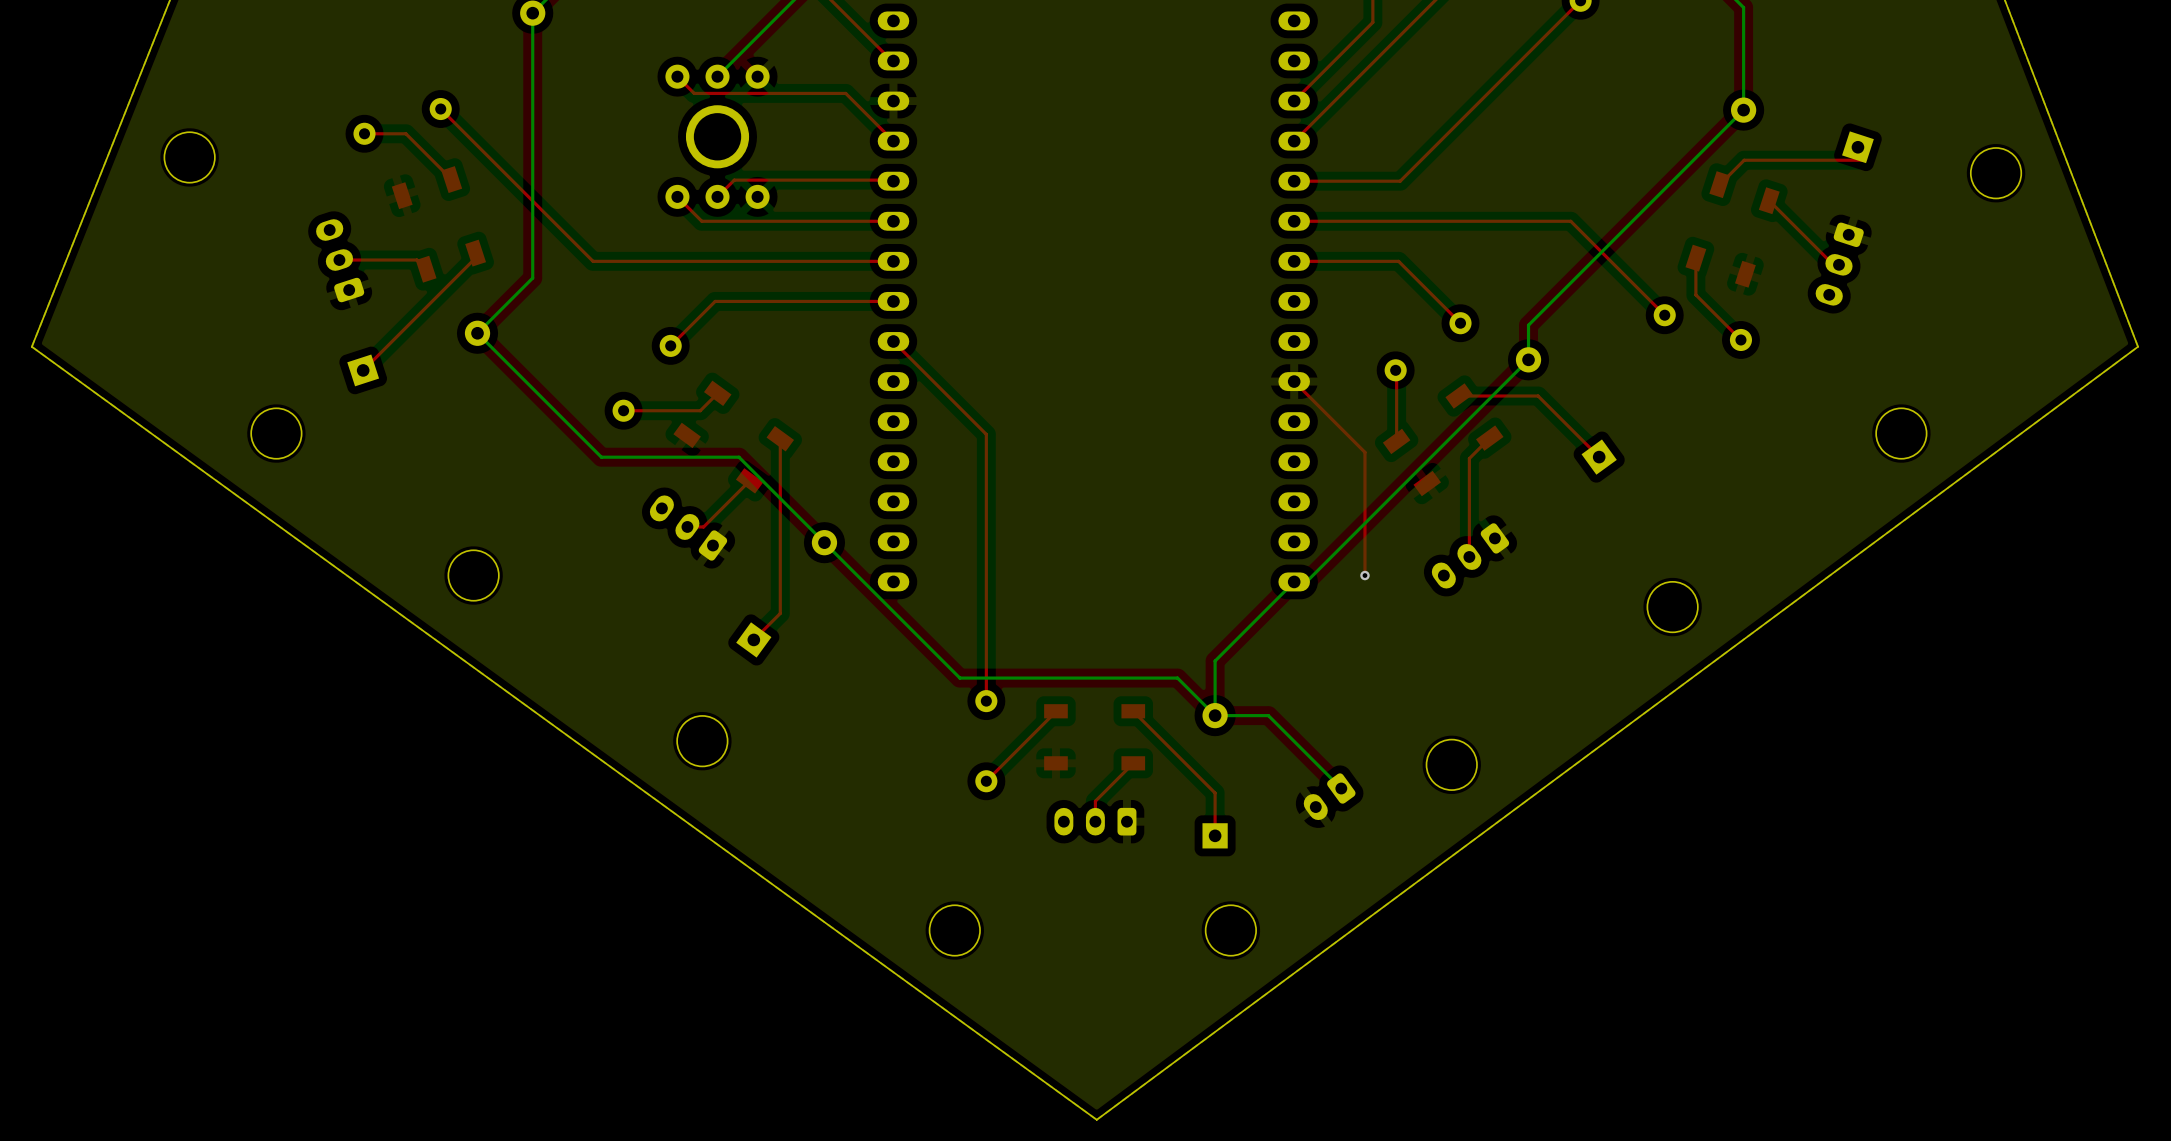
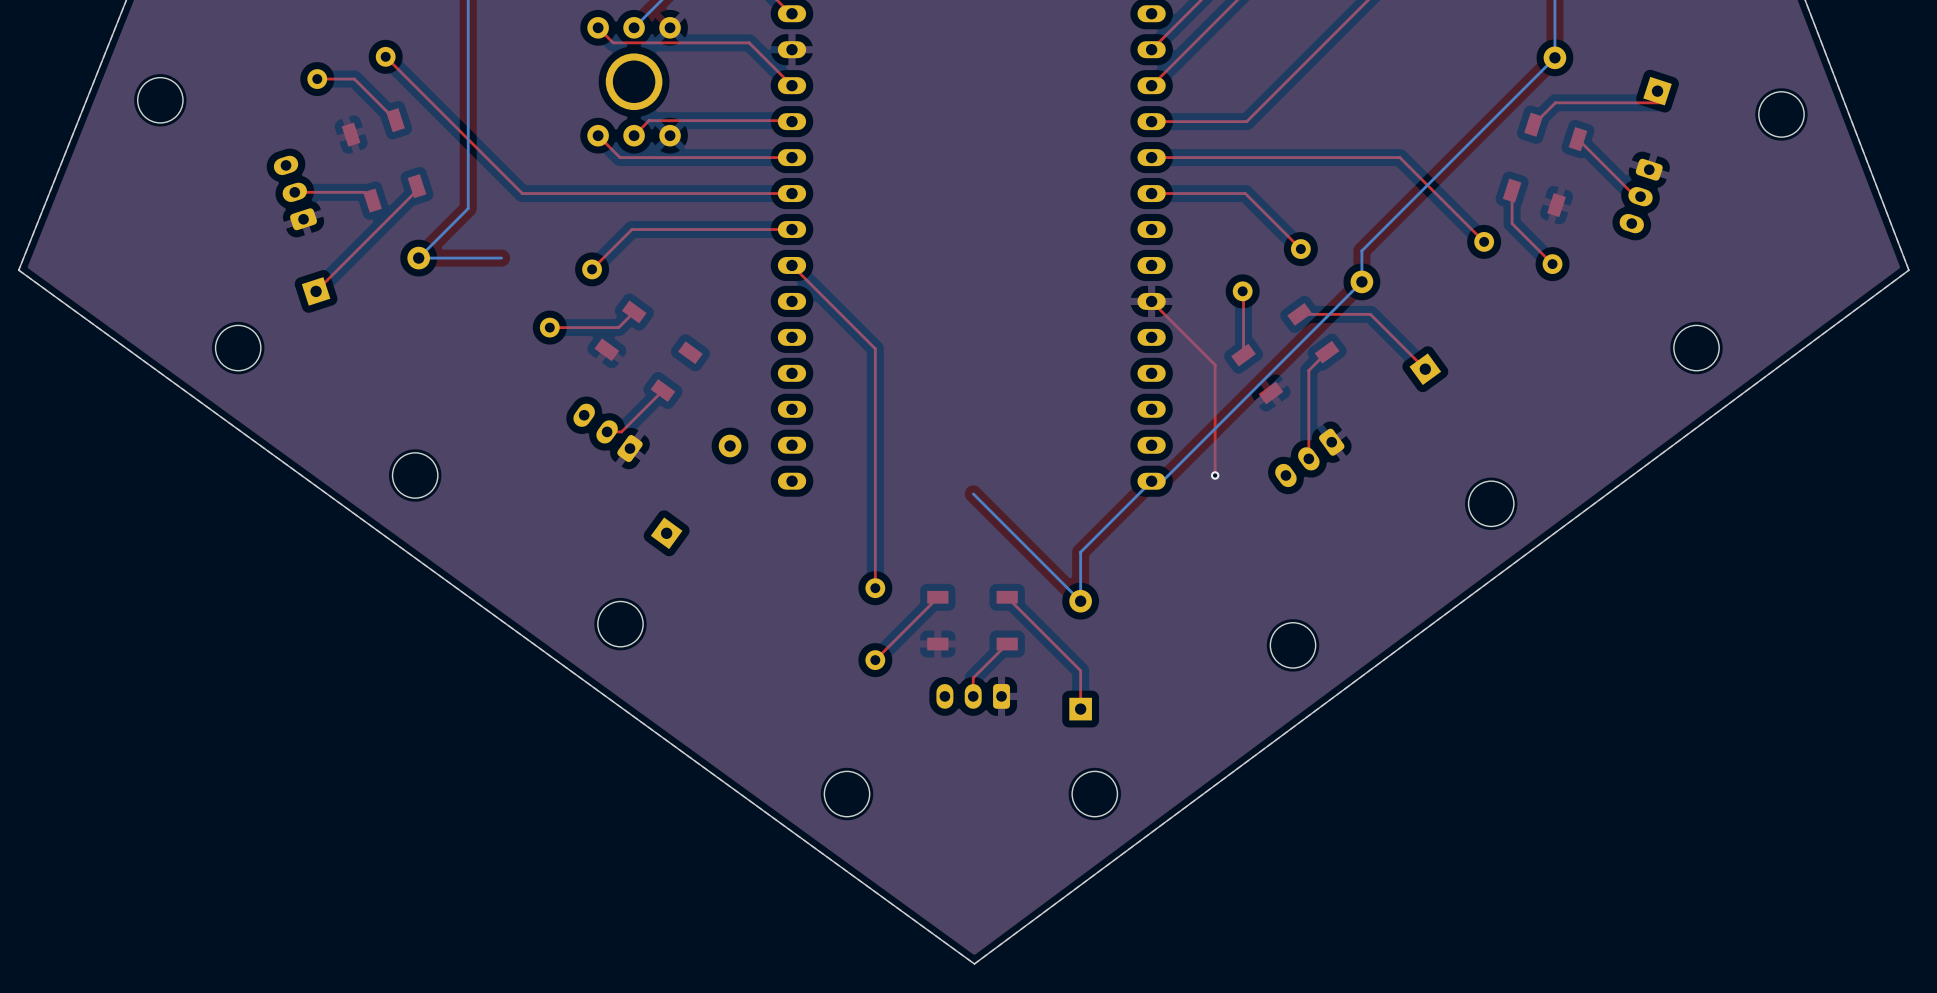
bottom track: (477, 333) (601, 457) (739, 457) (959, 678) (1177, 678) -> (973, 493) (1046, 567)
bottom track: none -> (501, 258) (418, 258)
top track: (780, 438) (780, 613) (753, 639) -> none
bottom track: (1215, 715) (1268, 715) (1341, 788) -> none
part: (1329, 796) -> none

